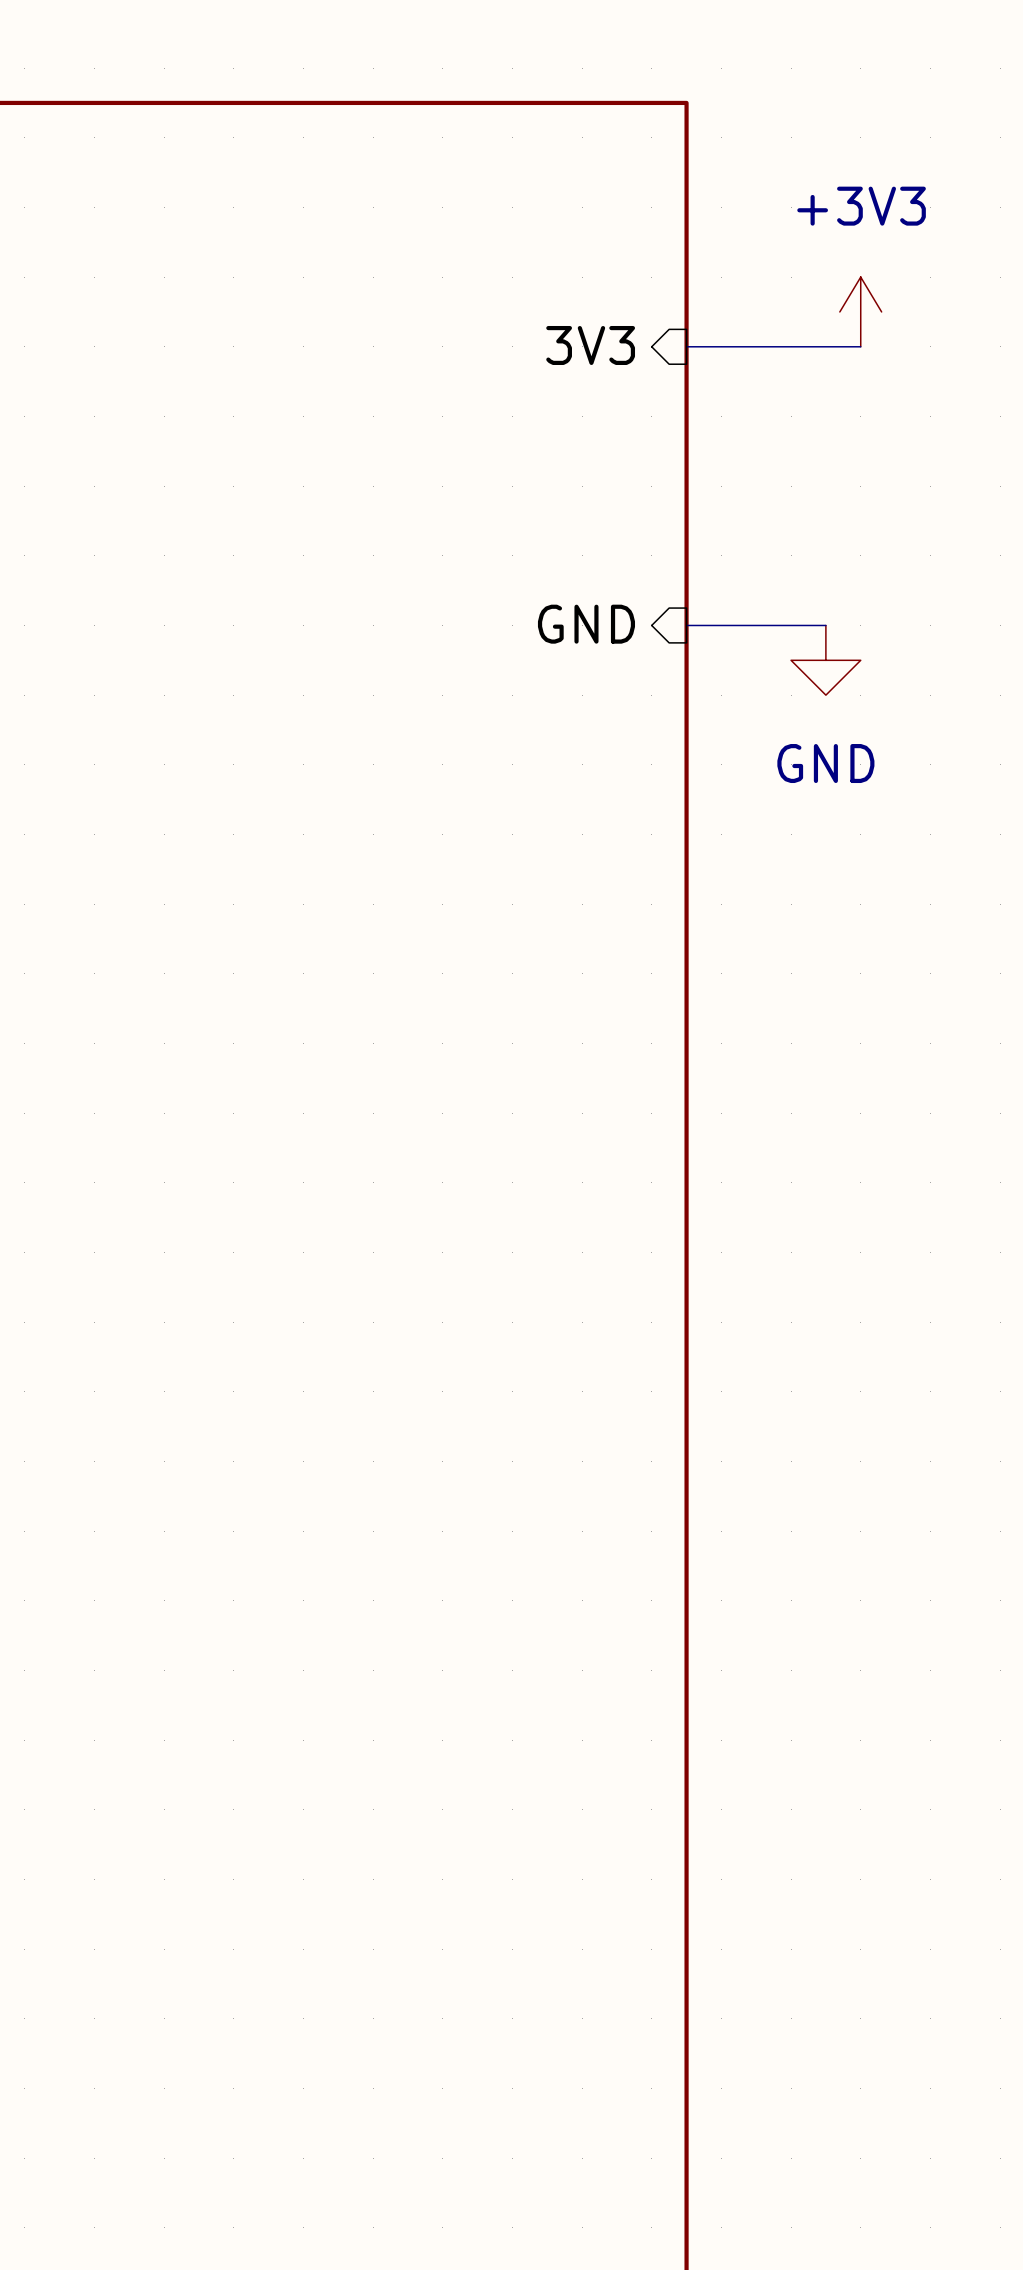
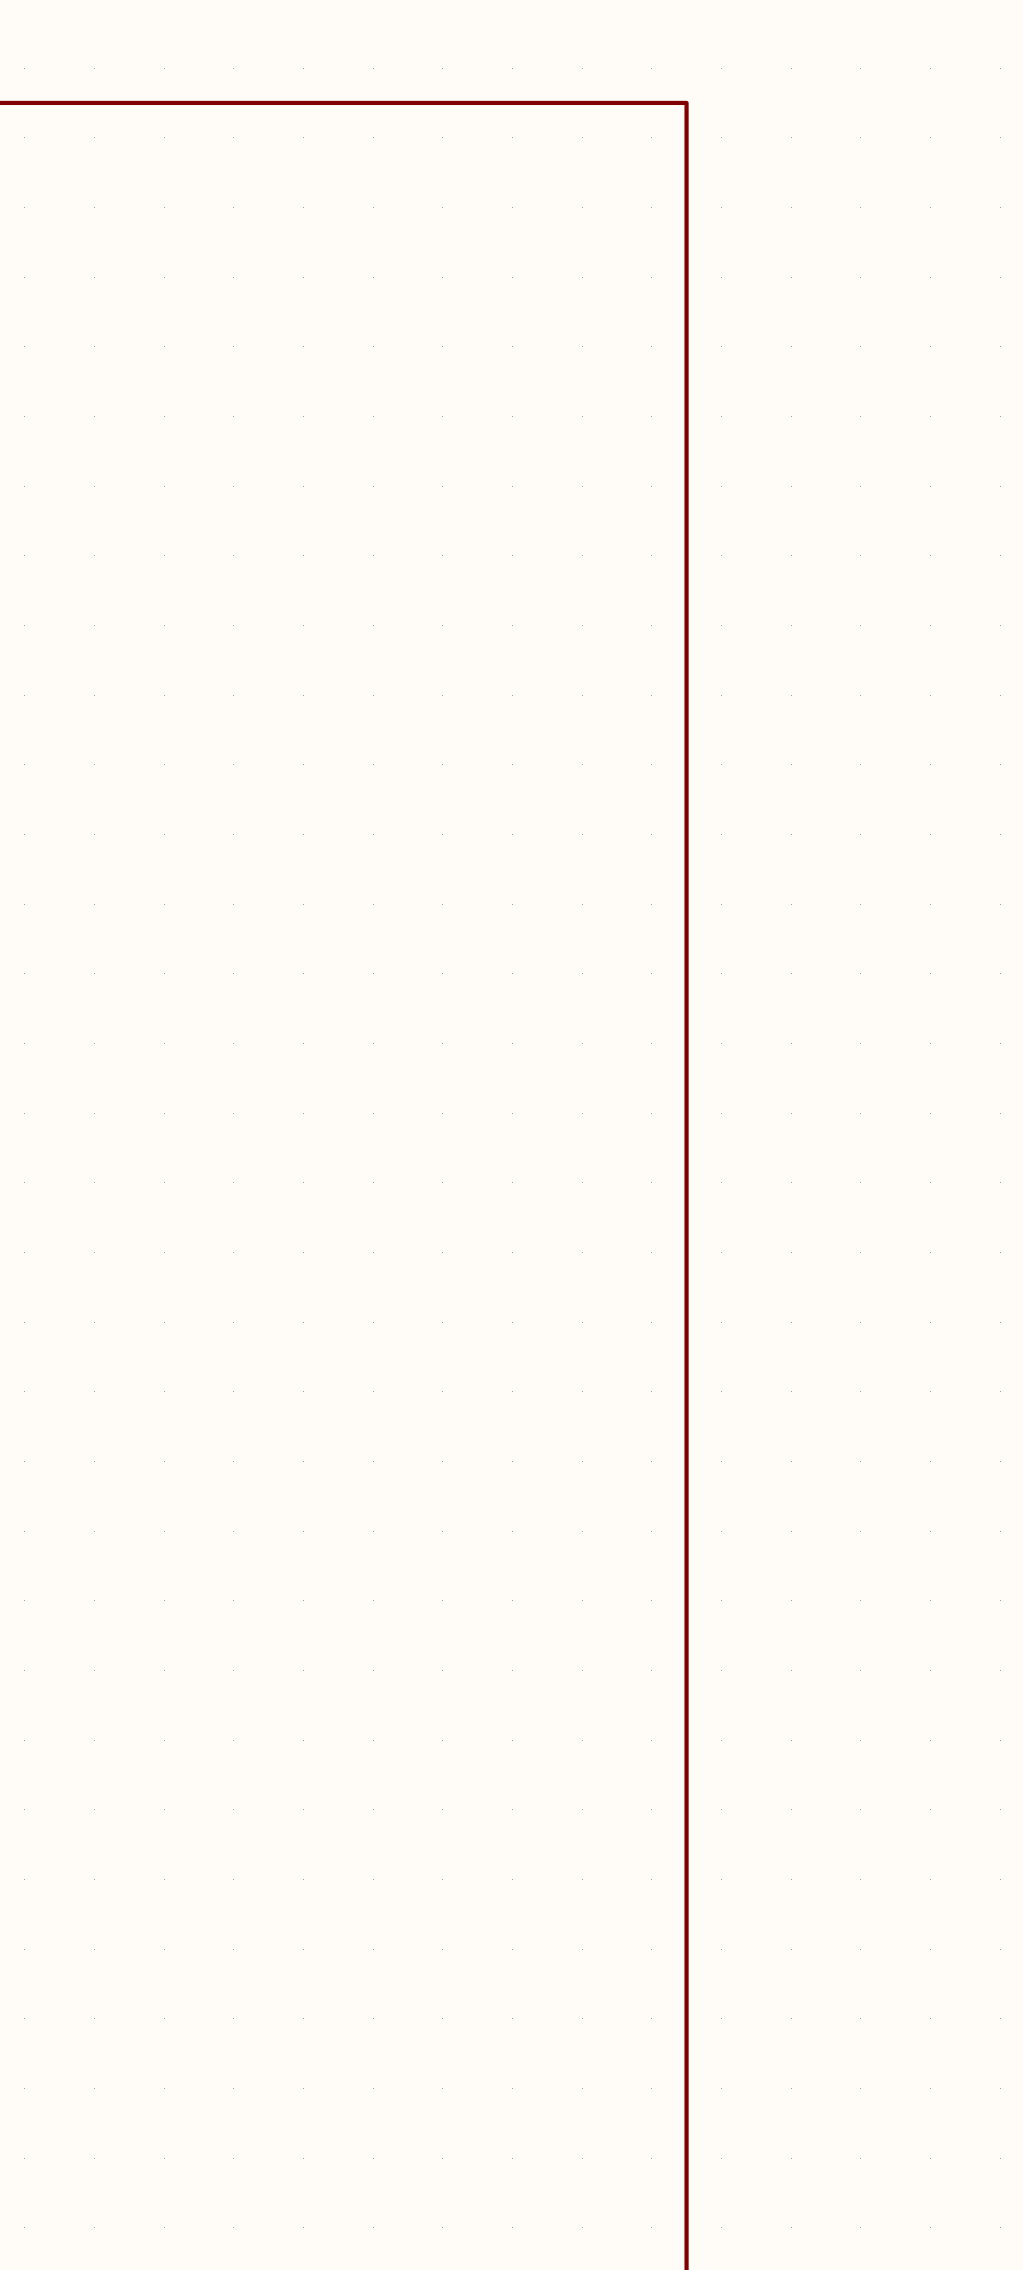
power symbol: +3V3 (860, 311) -> none
sheet pin: 3V3 (590, 345) -> none
wire: (686, 346) (860, 346) -> none
sheet pin: GND (586, 624) -> none
wire: (686, 625) (825, 625) -> none
power symbol: GND (825, 660) -> none

